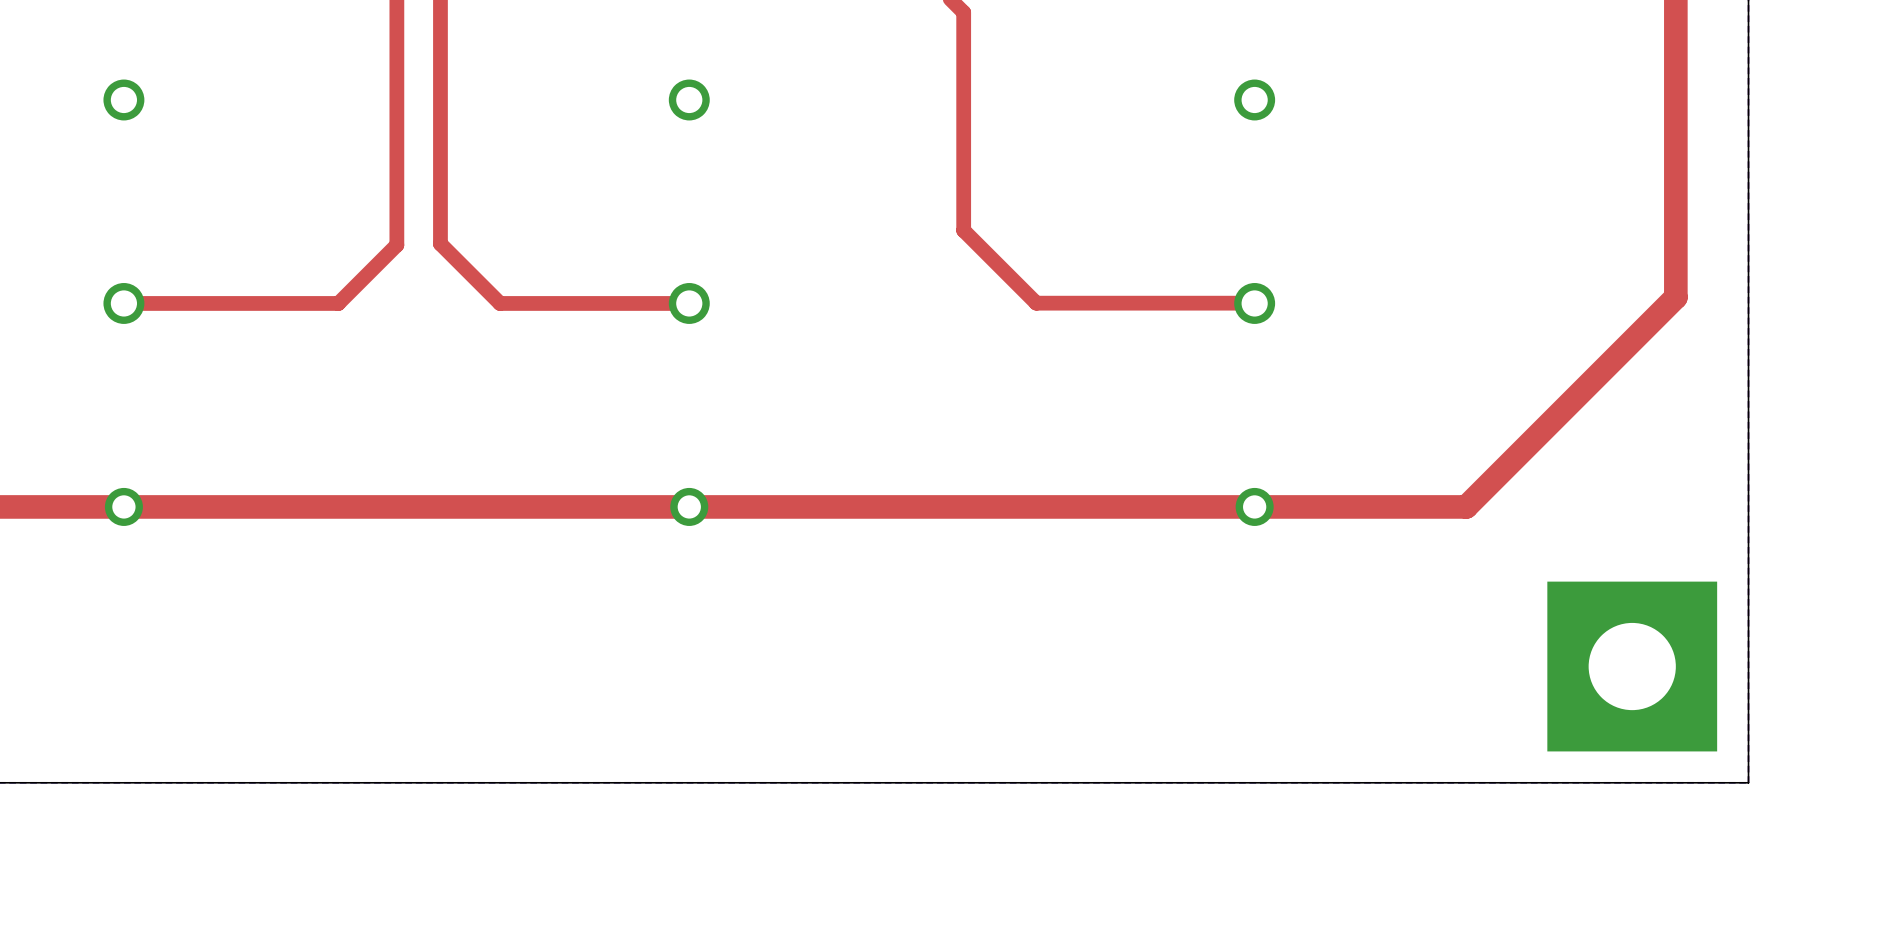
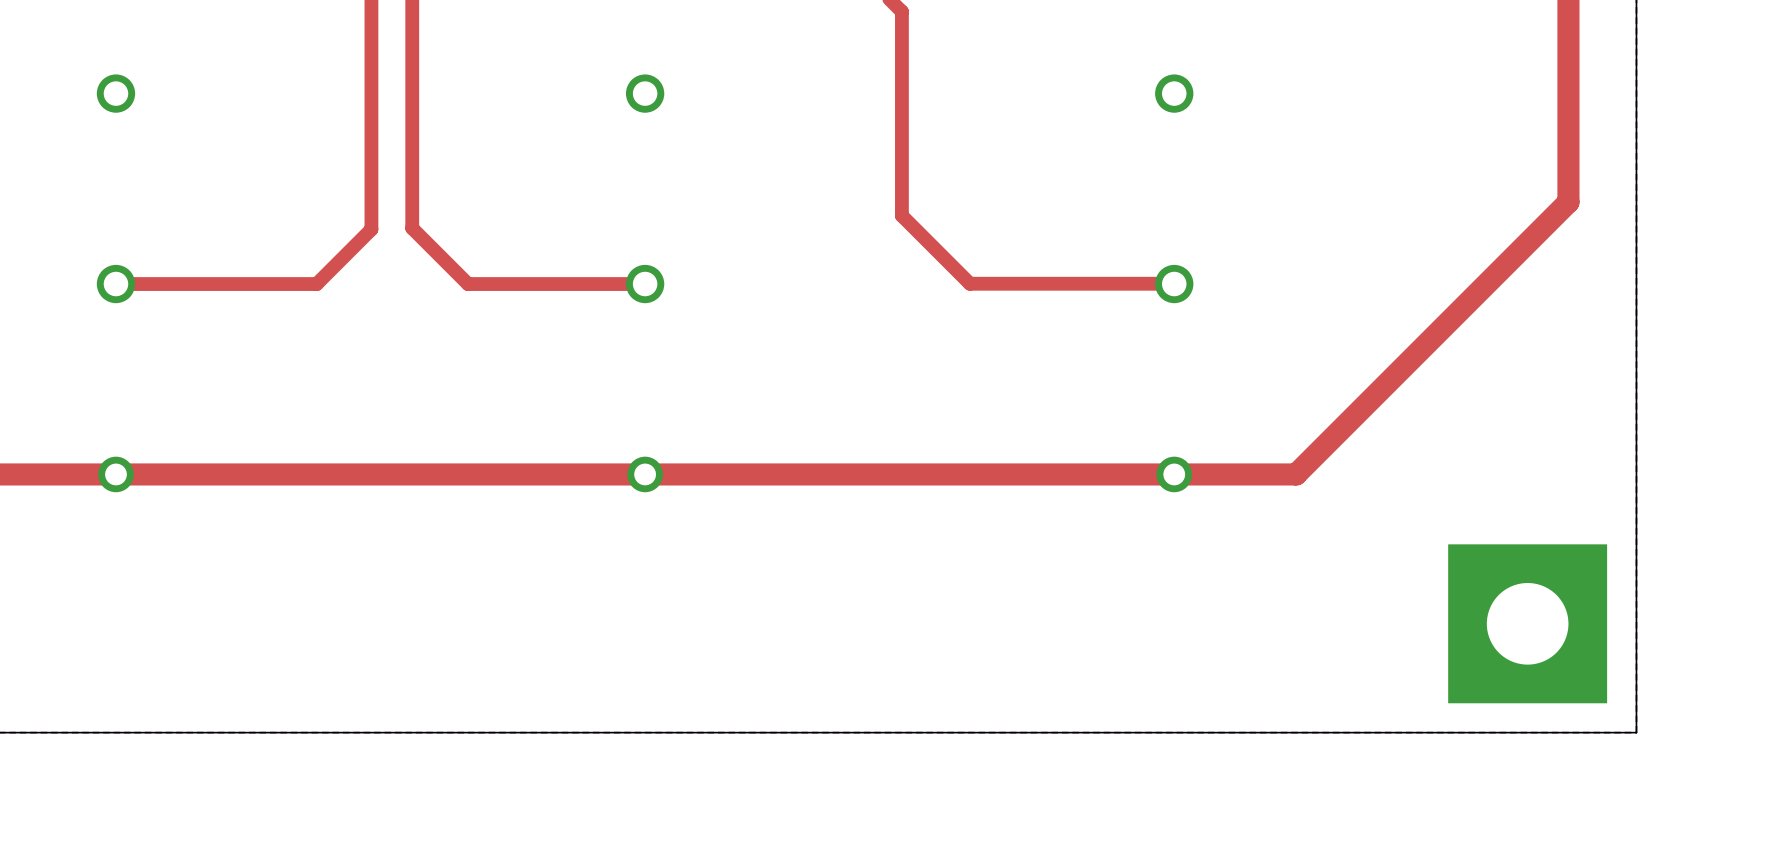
top track: (1675, 215) (1675, 297) (1466, 506) (1384, 506) -> (1568, 202) (1296, 474)

